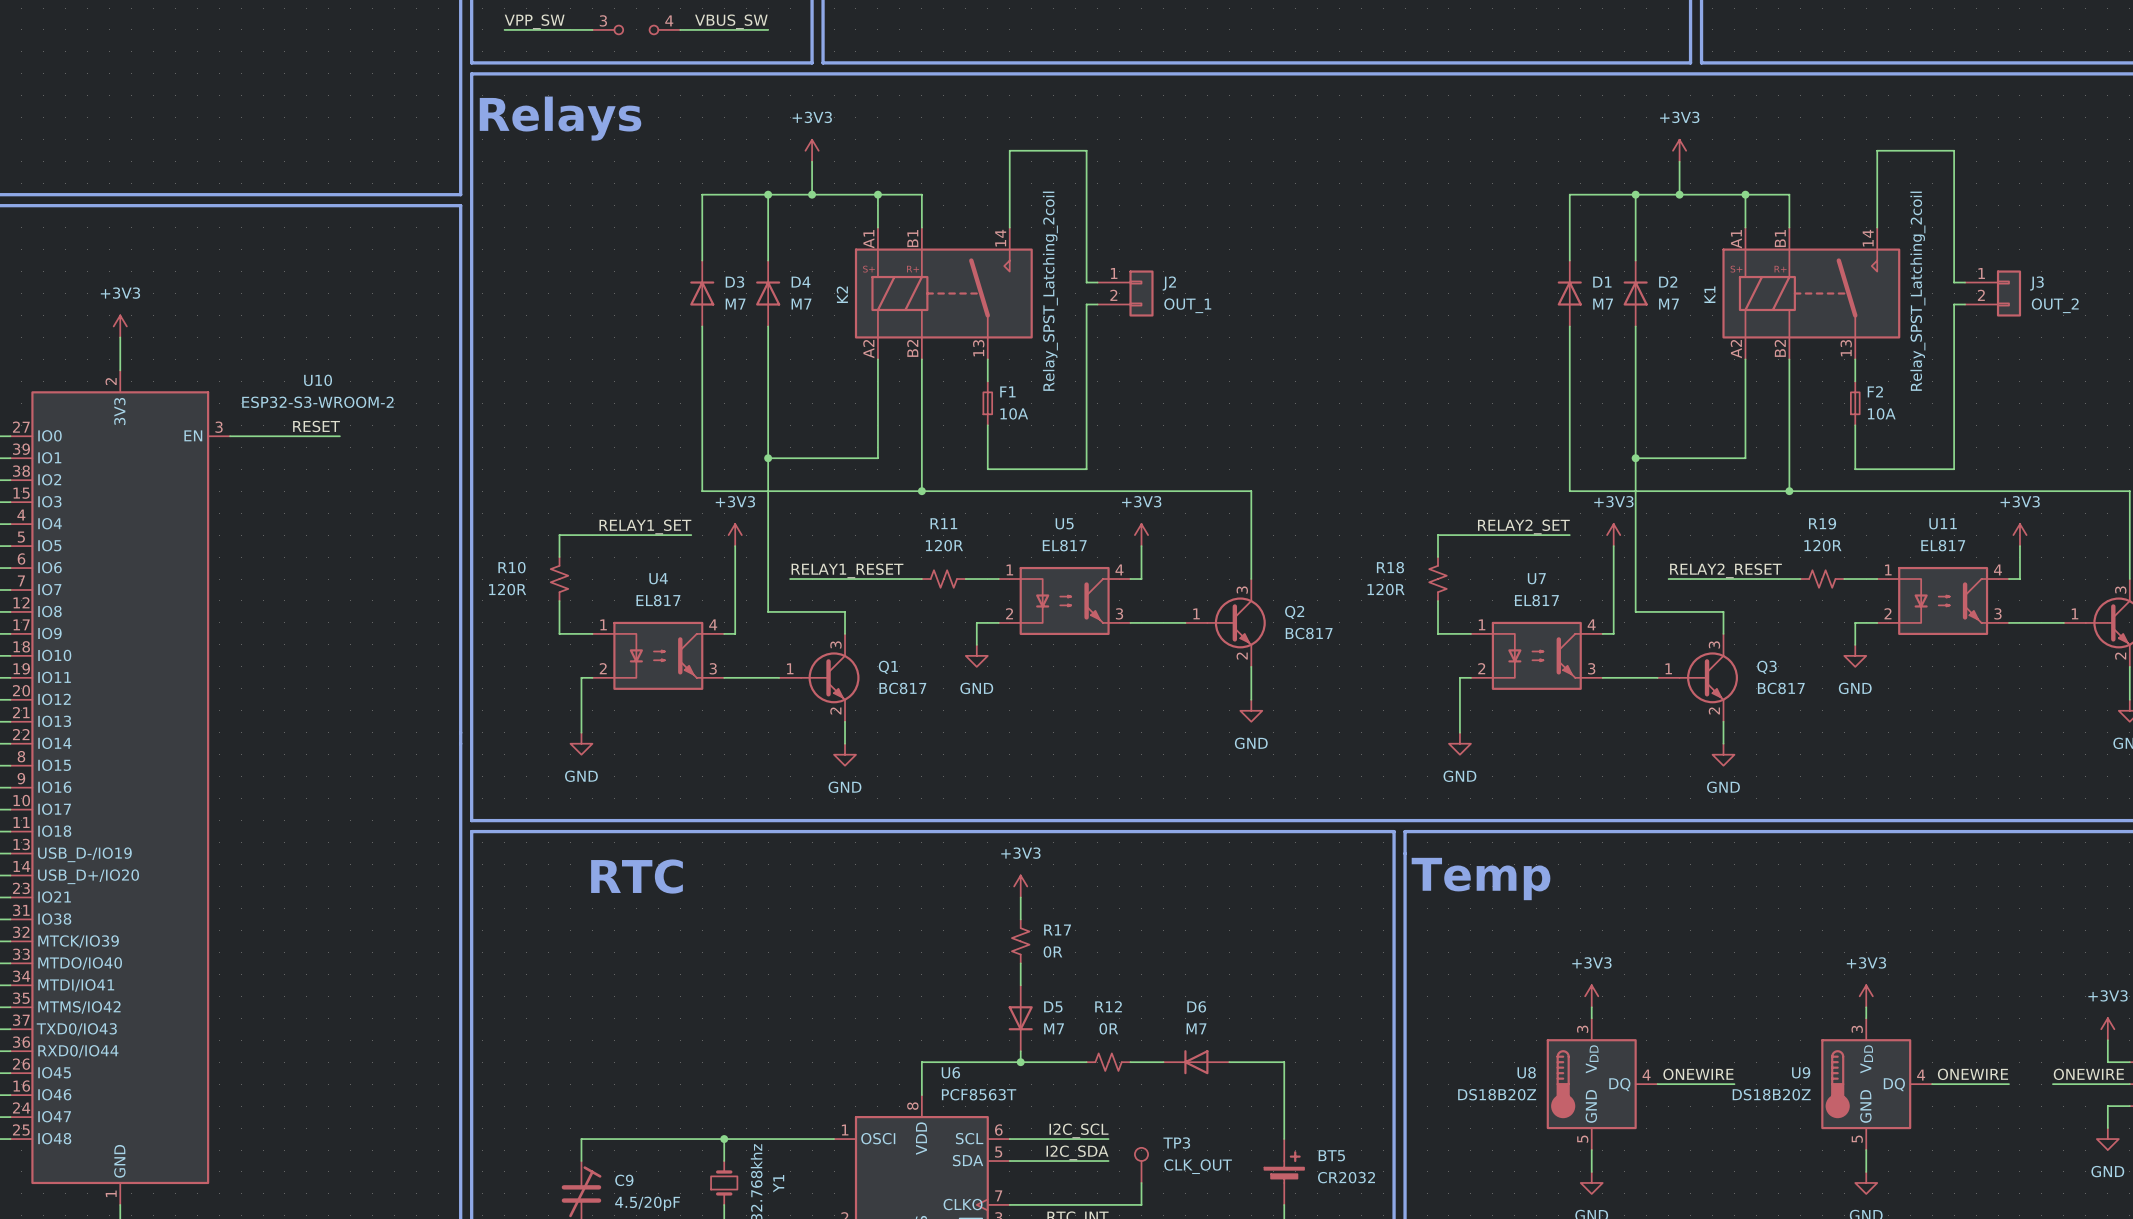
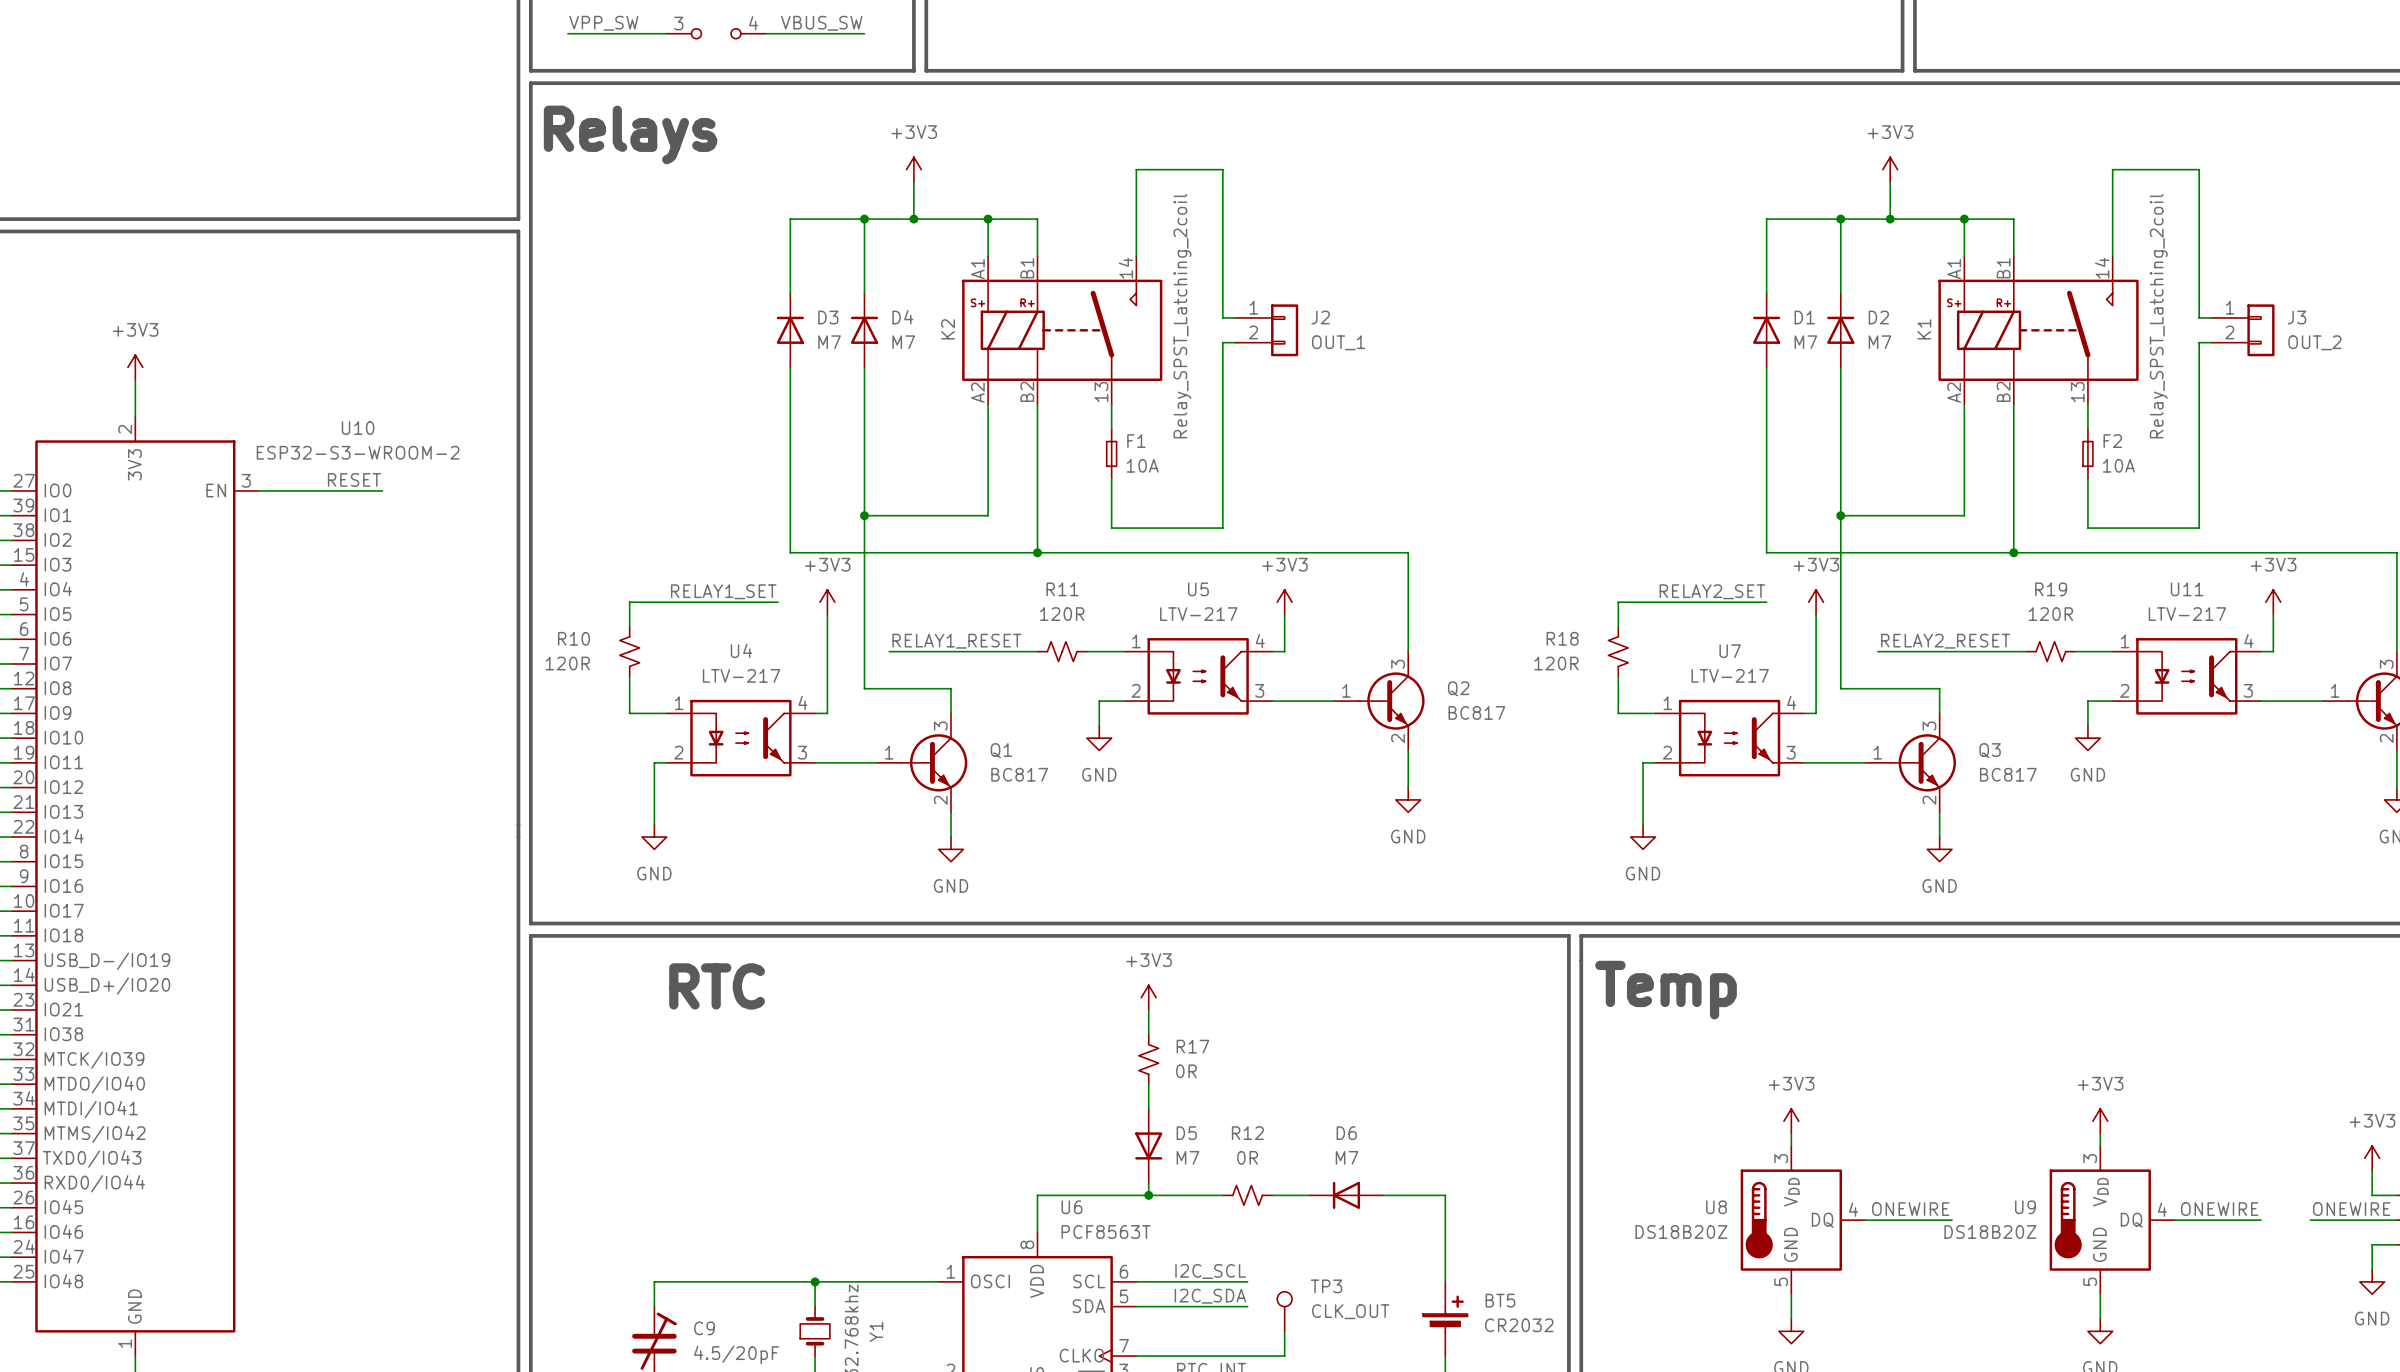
U5 value: EL817 (1064, 545) -> LTV-217 (1198, 614)
U11 value: EL817 (1943, 545) -> LTV-217 (2187, 614)
U4 value: EL817 (658, 600) -> LTV-217 (741, 675)
U7 value: EL817 (1536, 600) -> LTV-217 (1730, 675)

